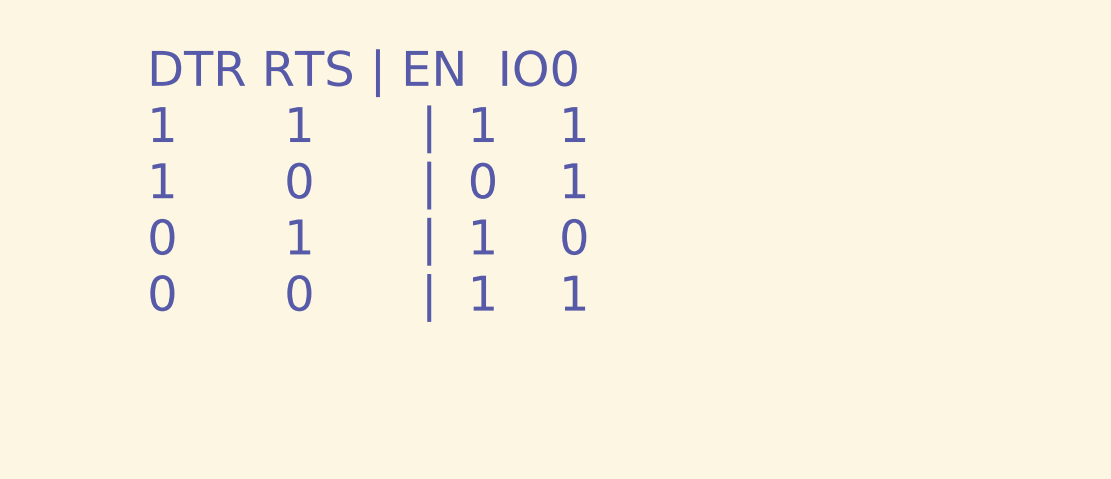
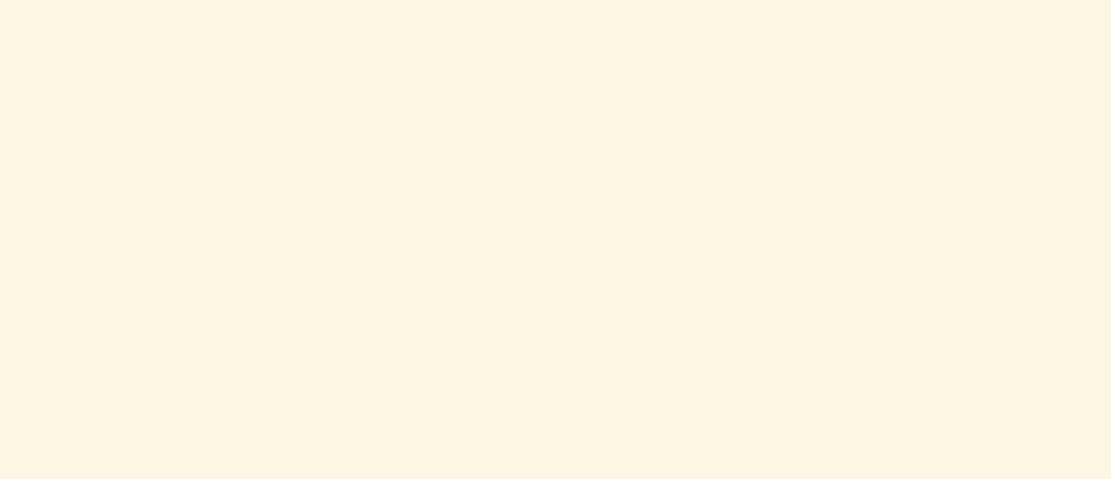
text: DTR RTS | EN IO0 (364, 73) -> none
text: 1 1 | 1 1 (368, 129) -> none
text: 1 0 | 0 1 (368, 185) -> none
text: 0 1 | 1 0 (368, 241) -> none
text: 0 0 | 1 1 (367, 297) -> none

